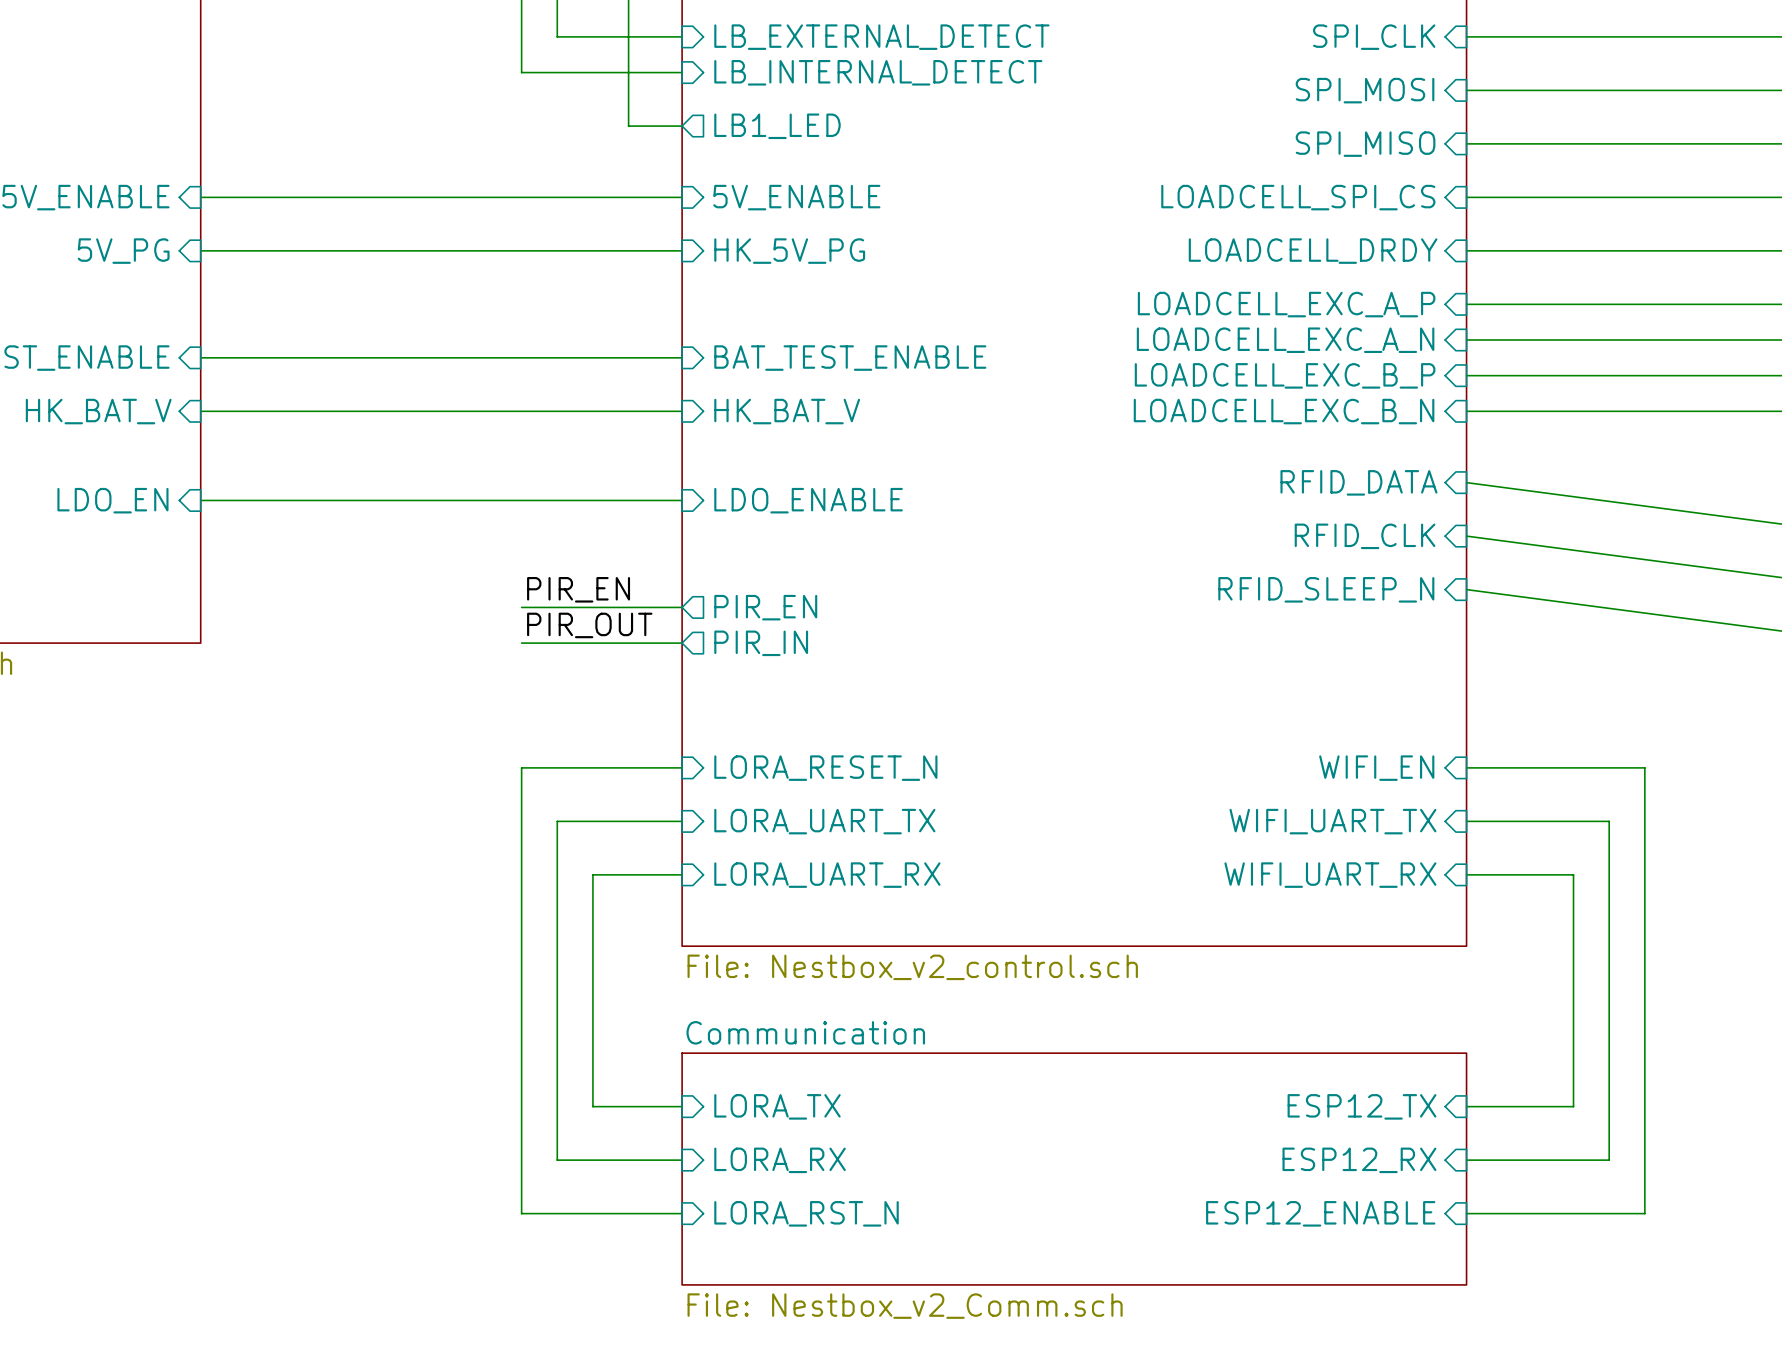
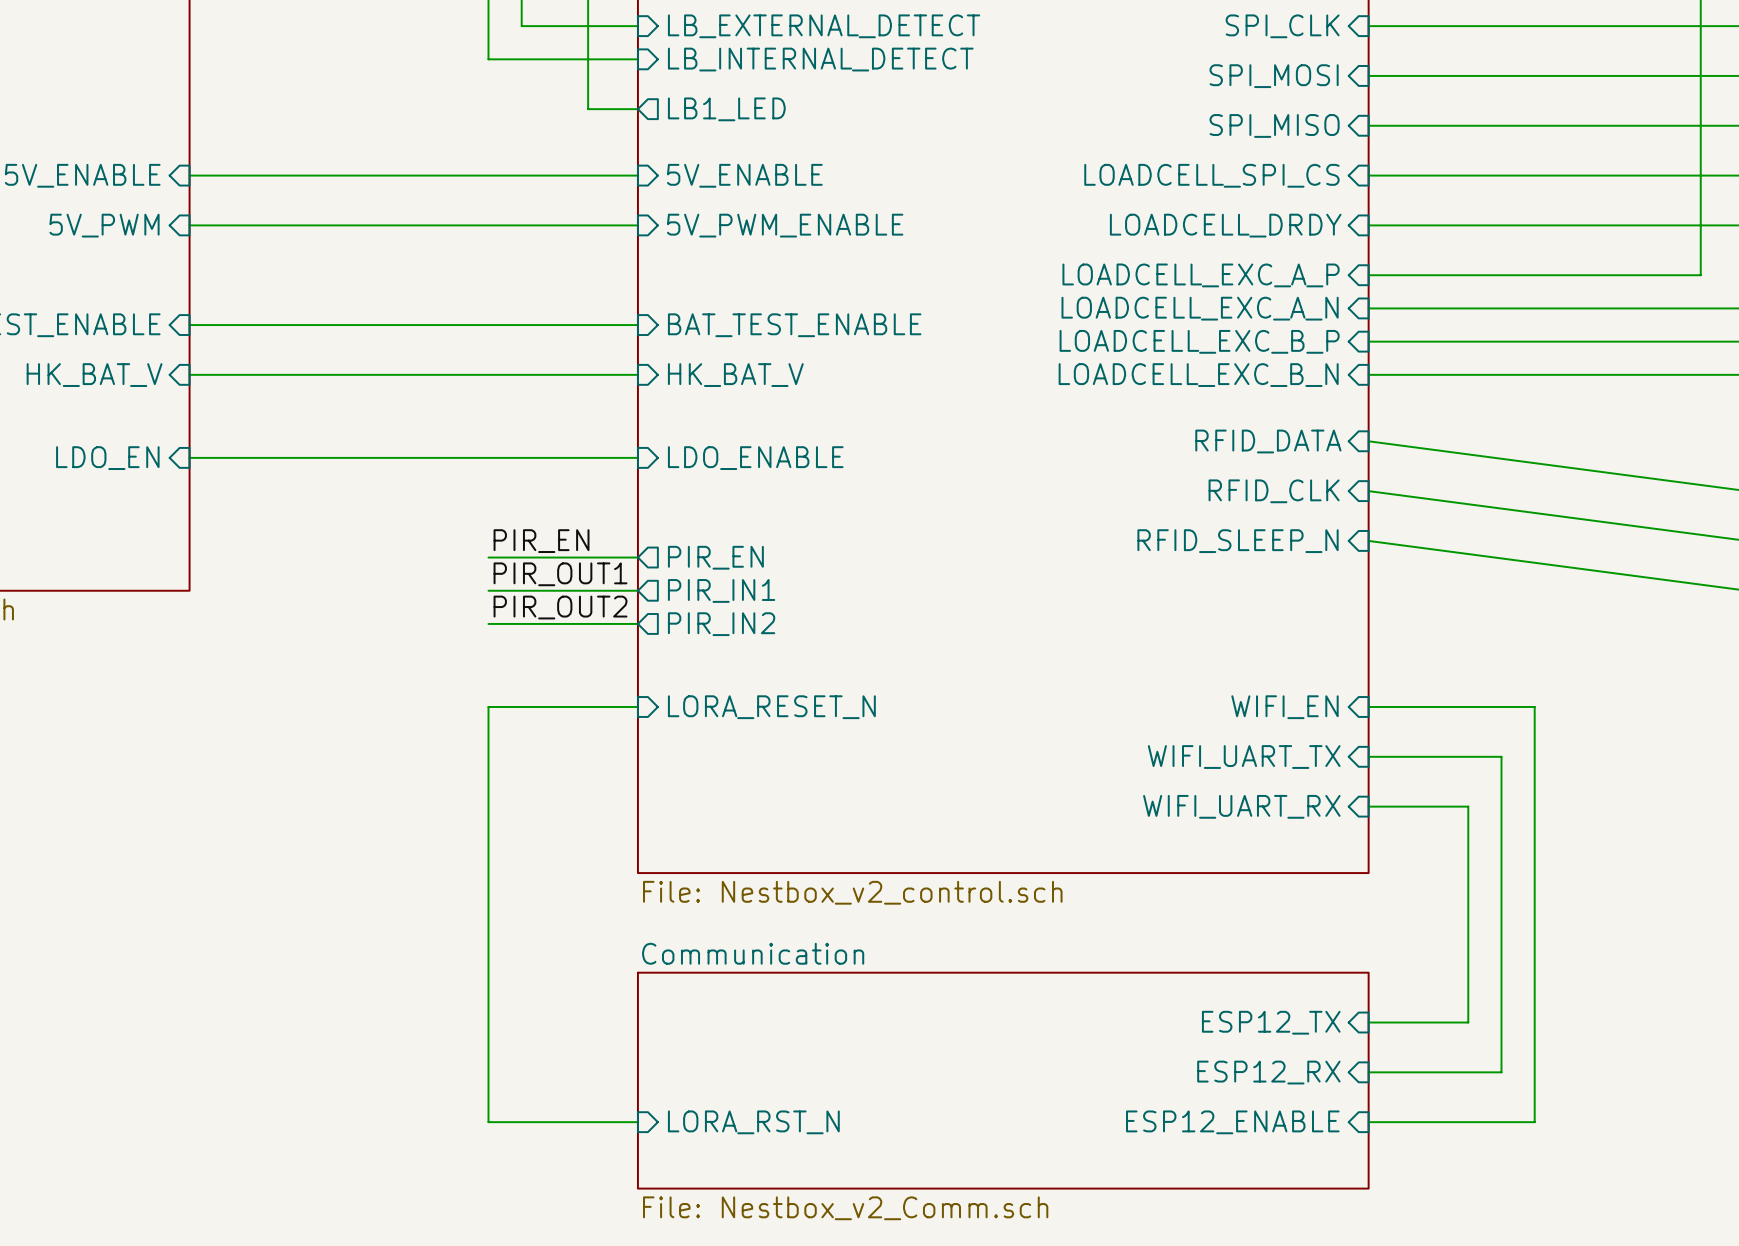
sheet pin: 5V_PG (123, 251) -> 5V_PWM (104, 225)
sheet pin: HK_5V_PG (789, 251) -> 5V_PWM_ENABLE (785, 225)
label: PIR_OUT (589, 625) -> PIR_OUT1 (560, 574)
sheet pin: PIR_IN (761, 643) -> PIR_IN1 (721, 590)
label: none -> PIR_OUT2 (560, 607)
wire: none -> (488, 623) (637, 623)
sheet pin: none -> PIR_IN2 (721, 624)
wire: (682, 821) (557, 821) (557, 1160) (682, 1160) -> none
sheet pin: LORA_UART_TX (824, 821) -> none
wire: (682, 874) (592, 874) (592, 1106) (682, 1106) -> none
sheet pin: LORA_UART_RX (827, 875) -> none
sheet pin: LORA_TX (777, 1106) -> none
sheet pin: LORA_RX (780, 1160) -> none

